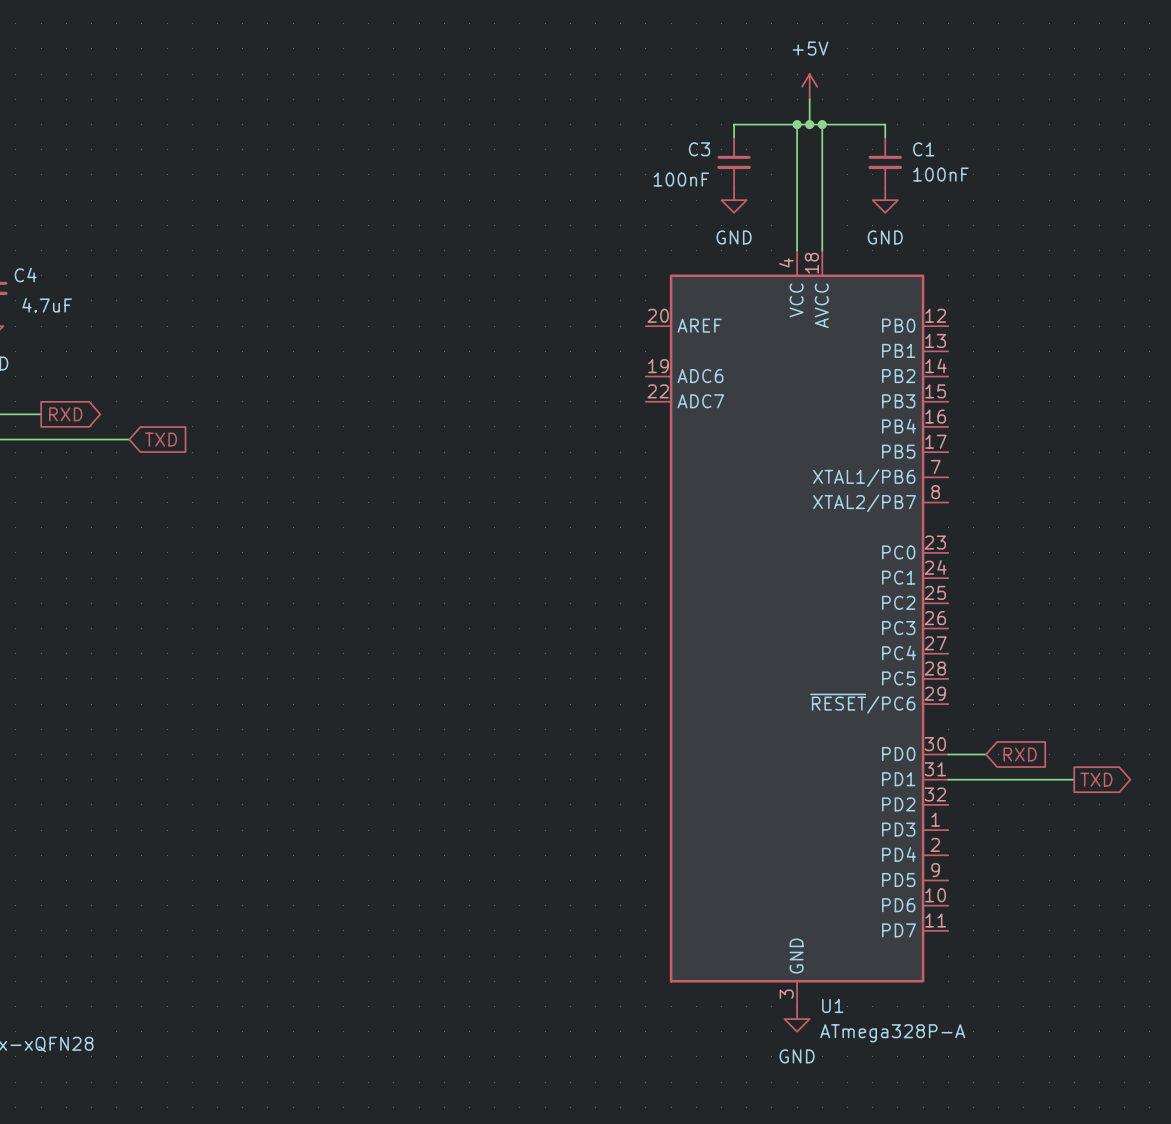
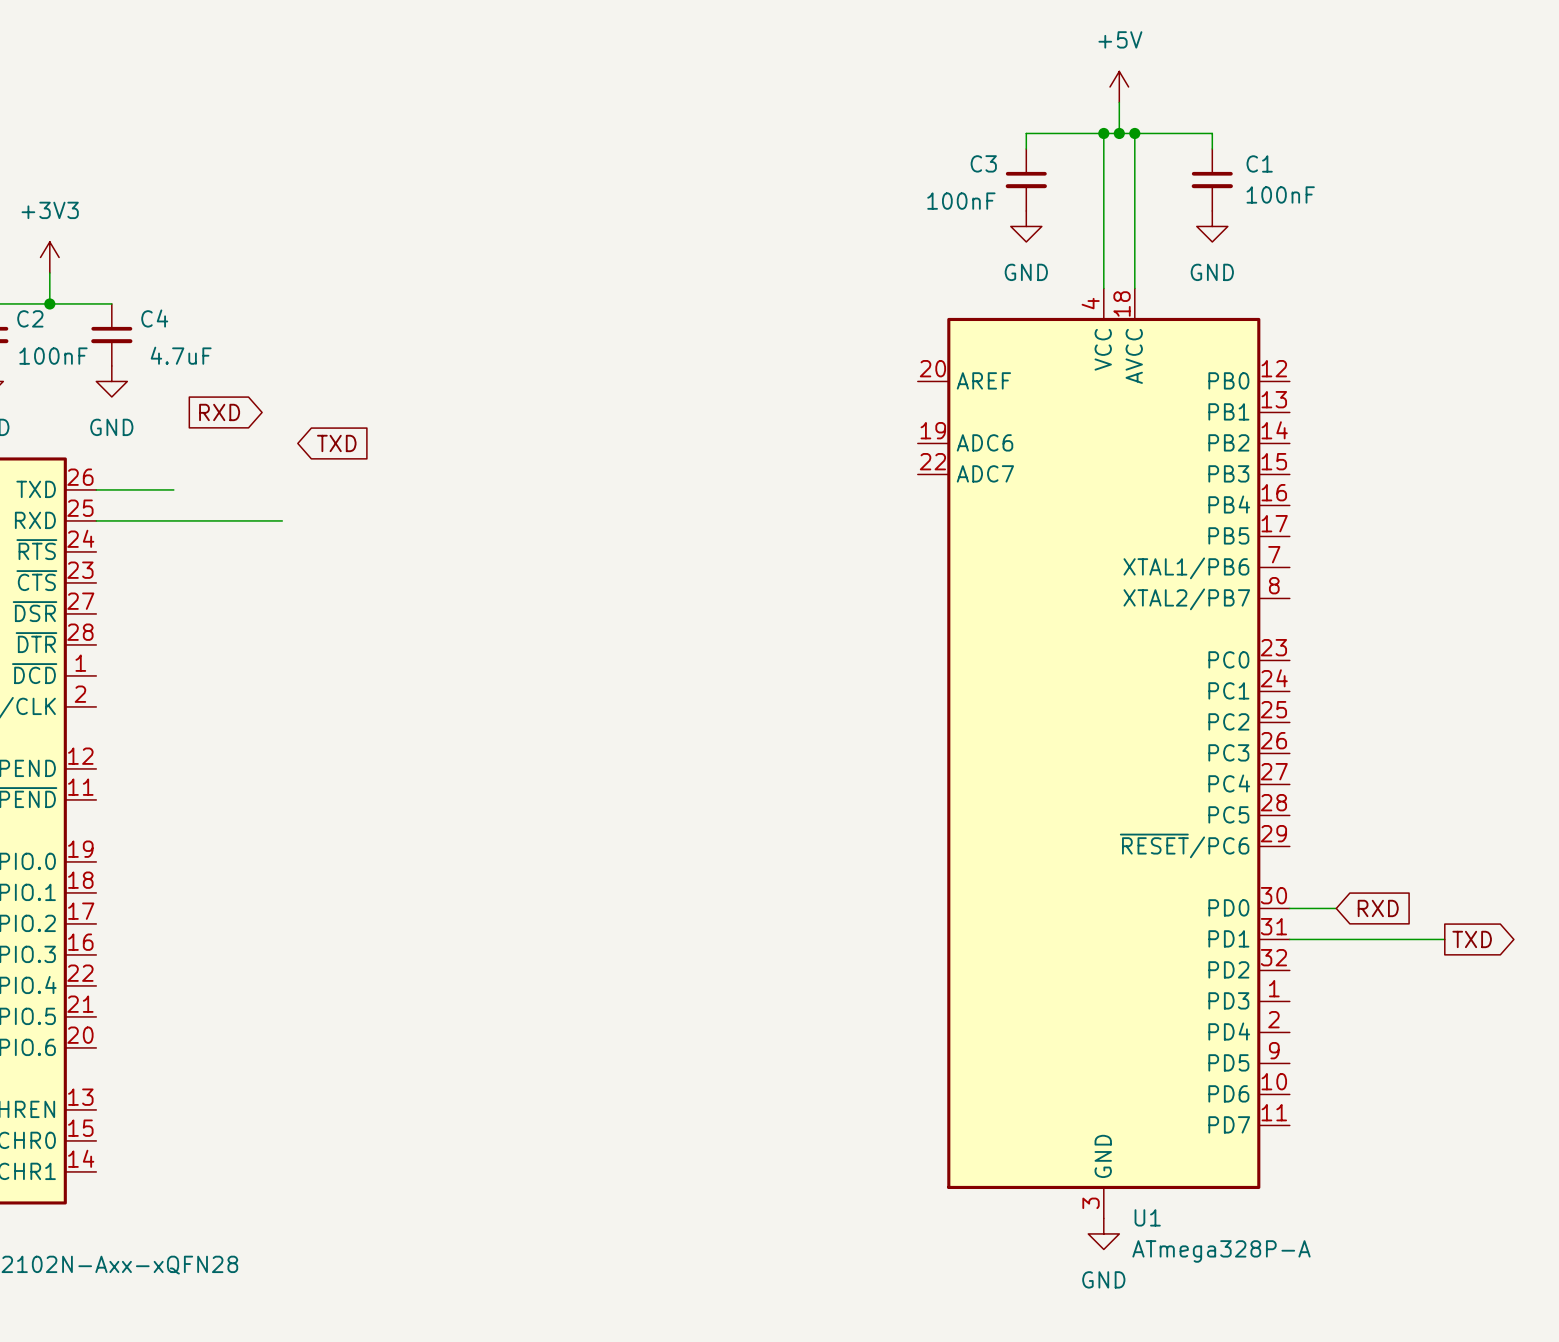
global label position: RXD (65, 414) -> RXD (219, 412)
global label position: TXD (161, 439) -> TXD (336, 443)

